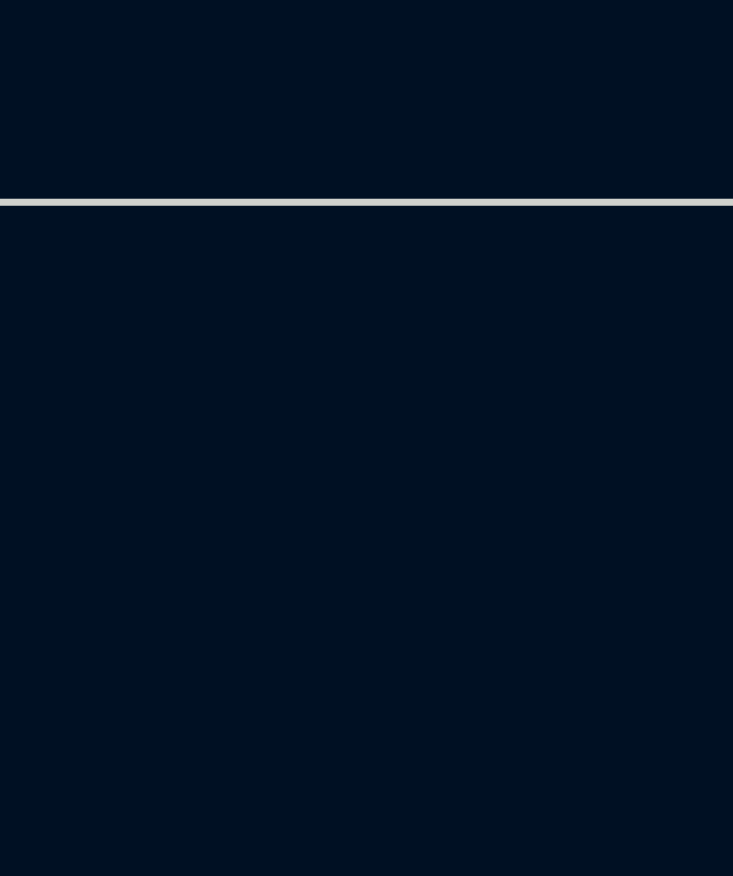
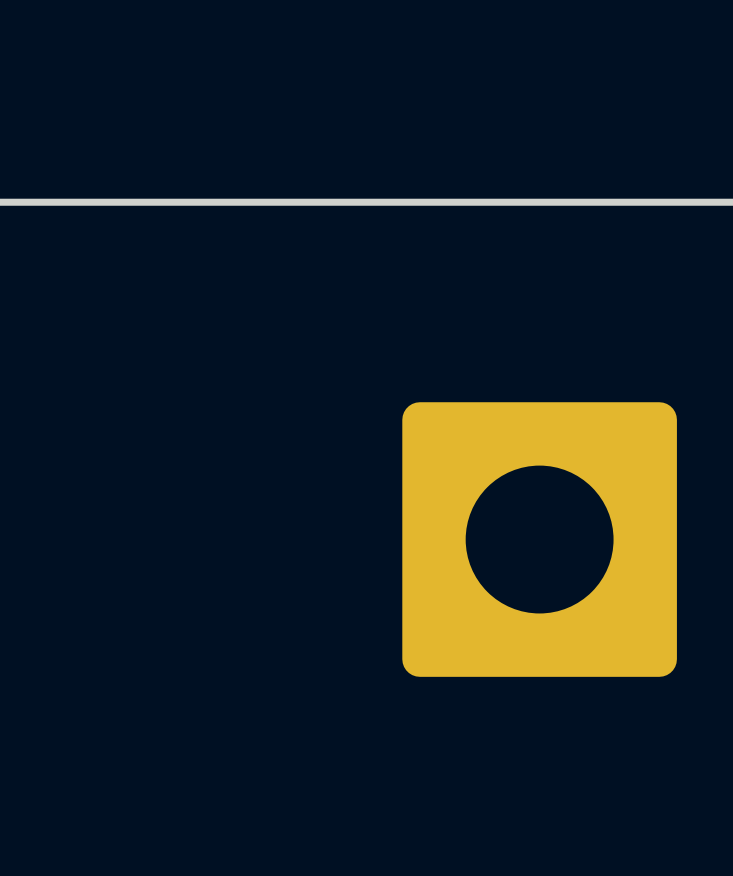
part: none -> (539, 539)

